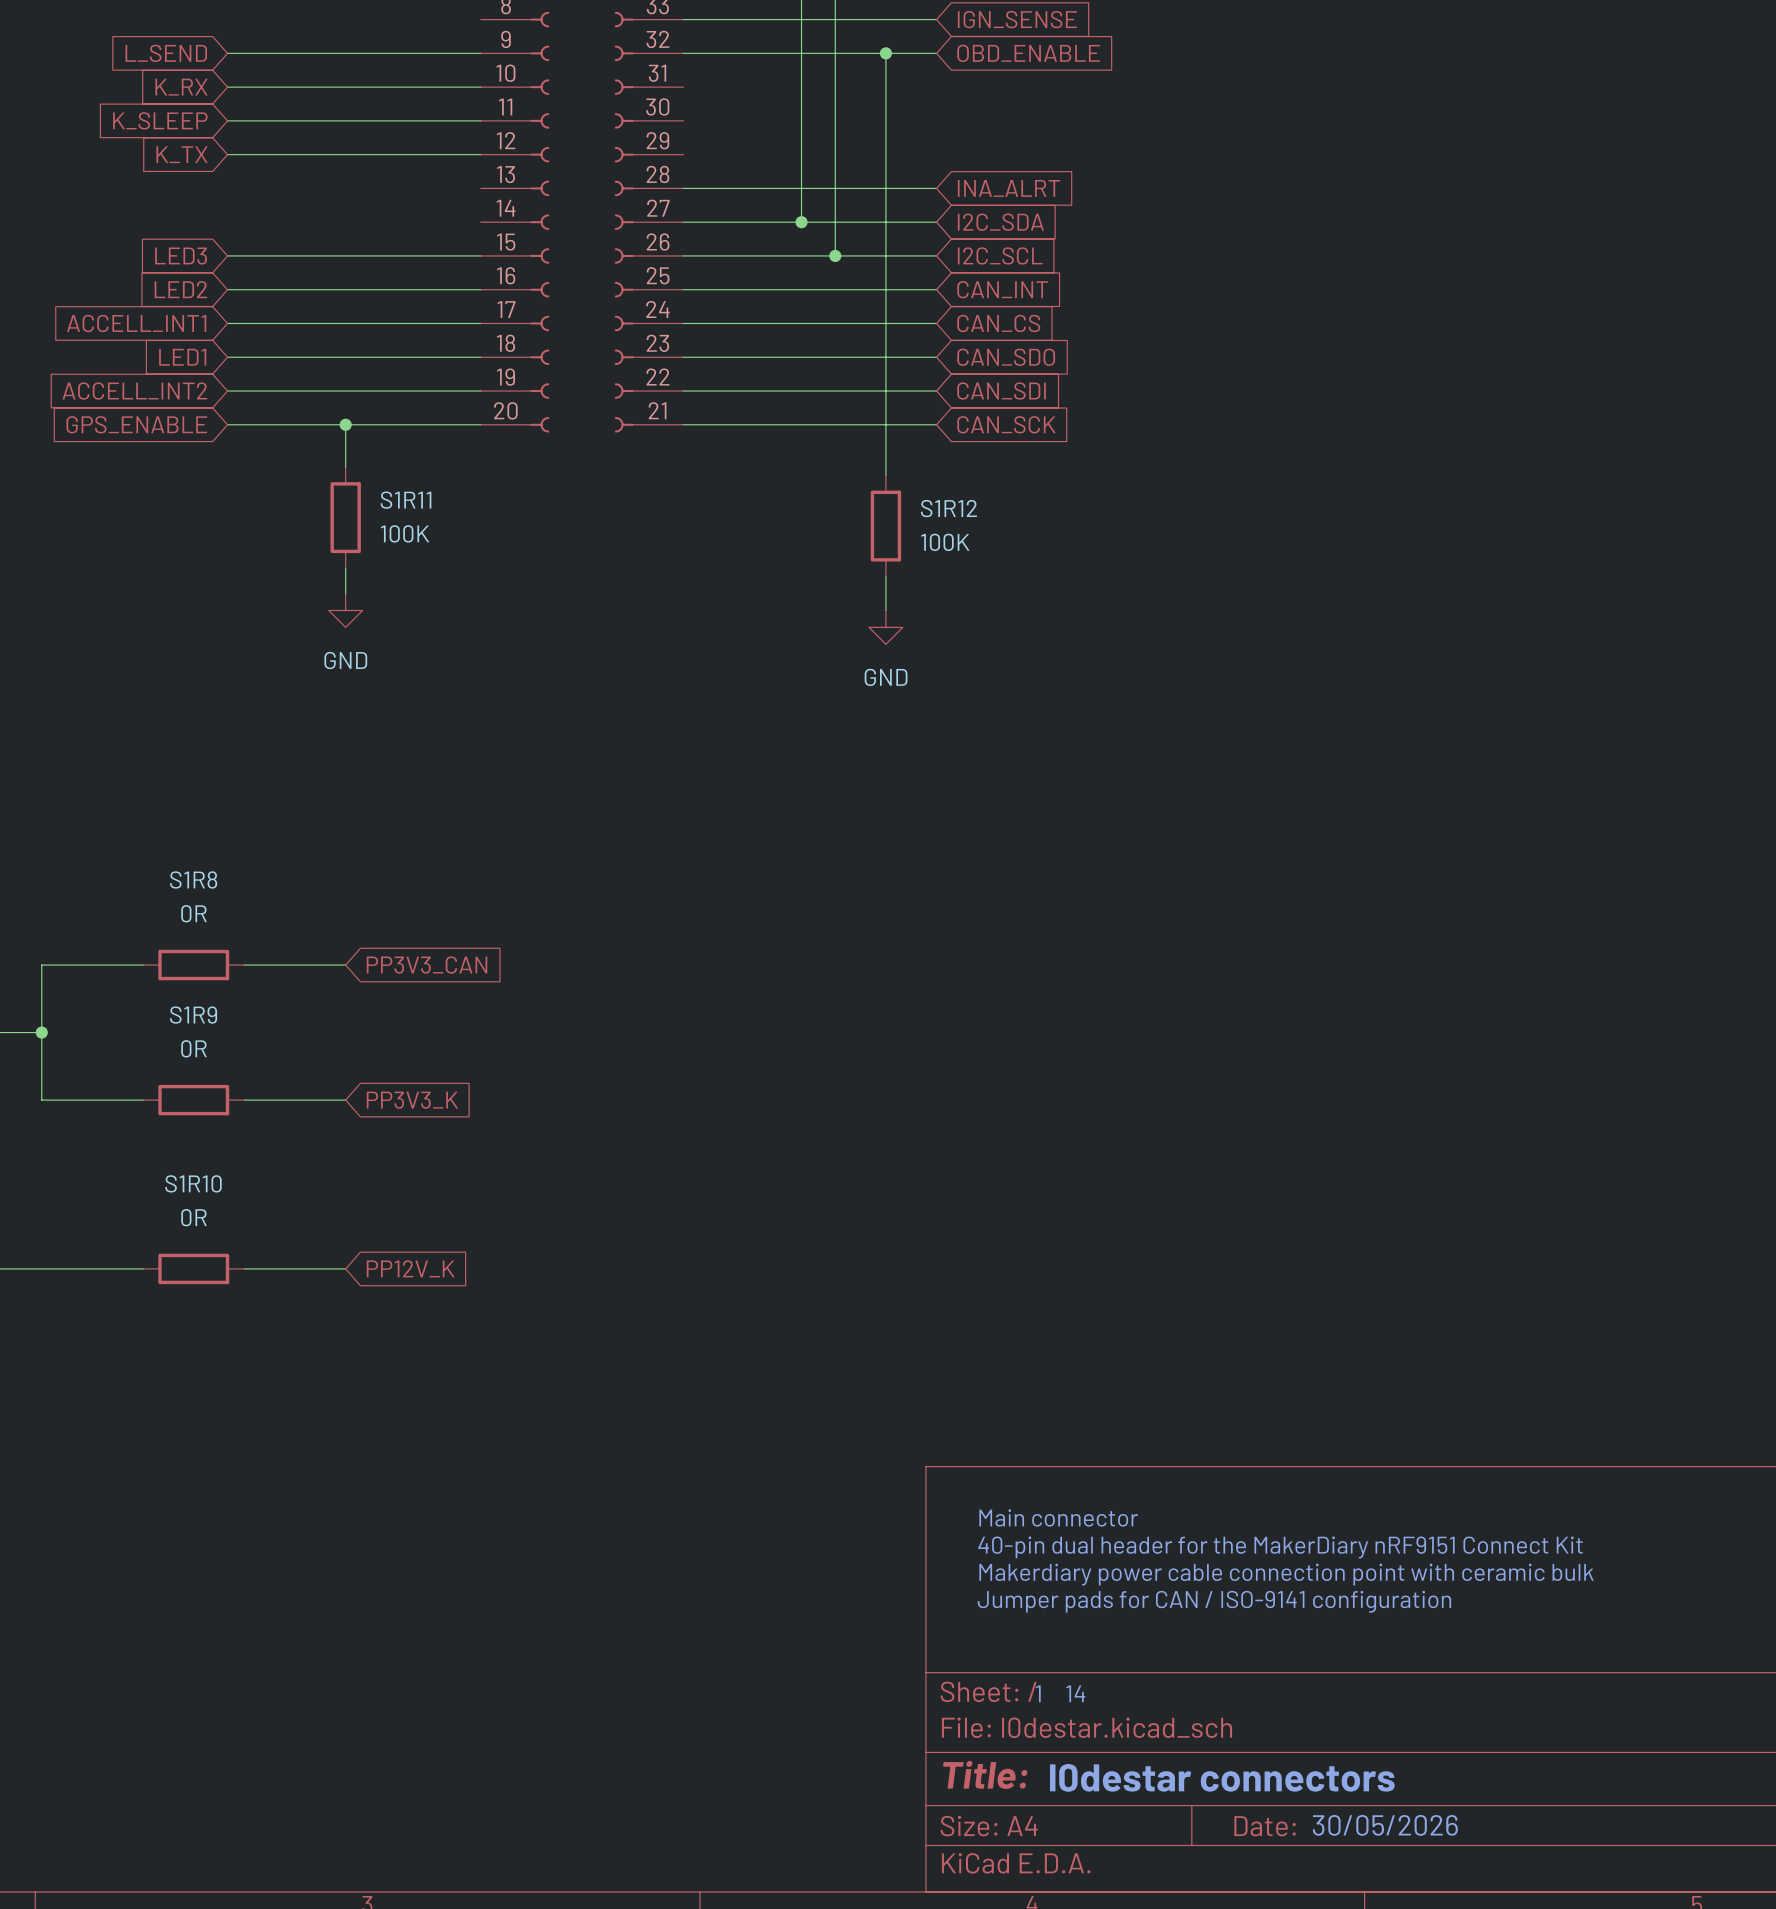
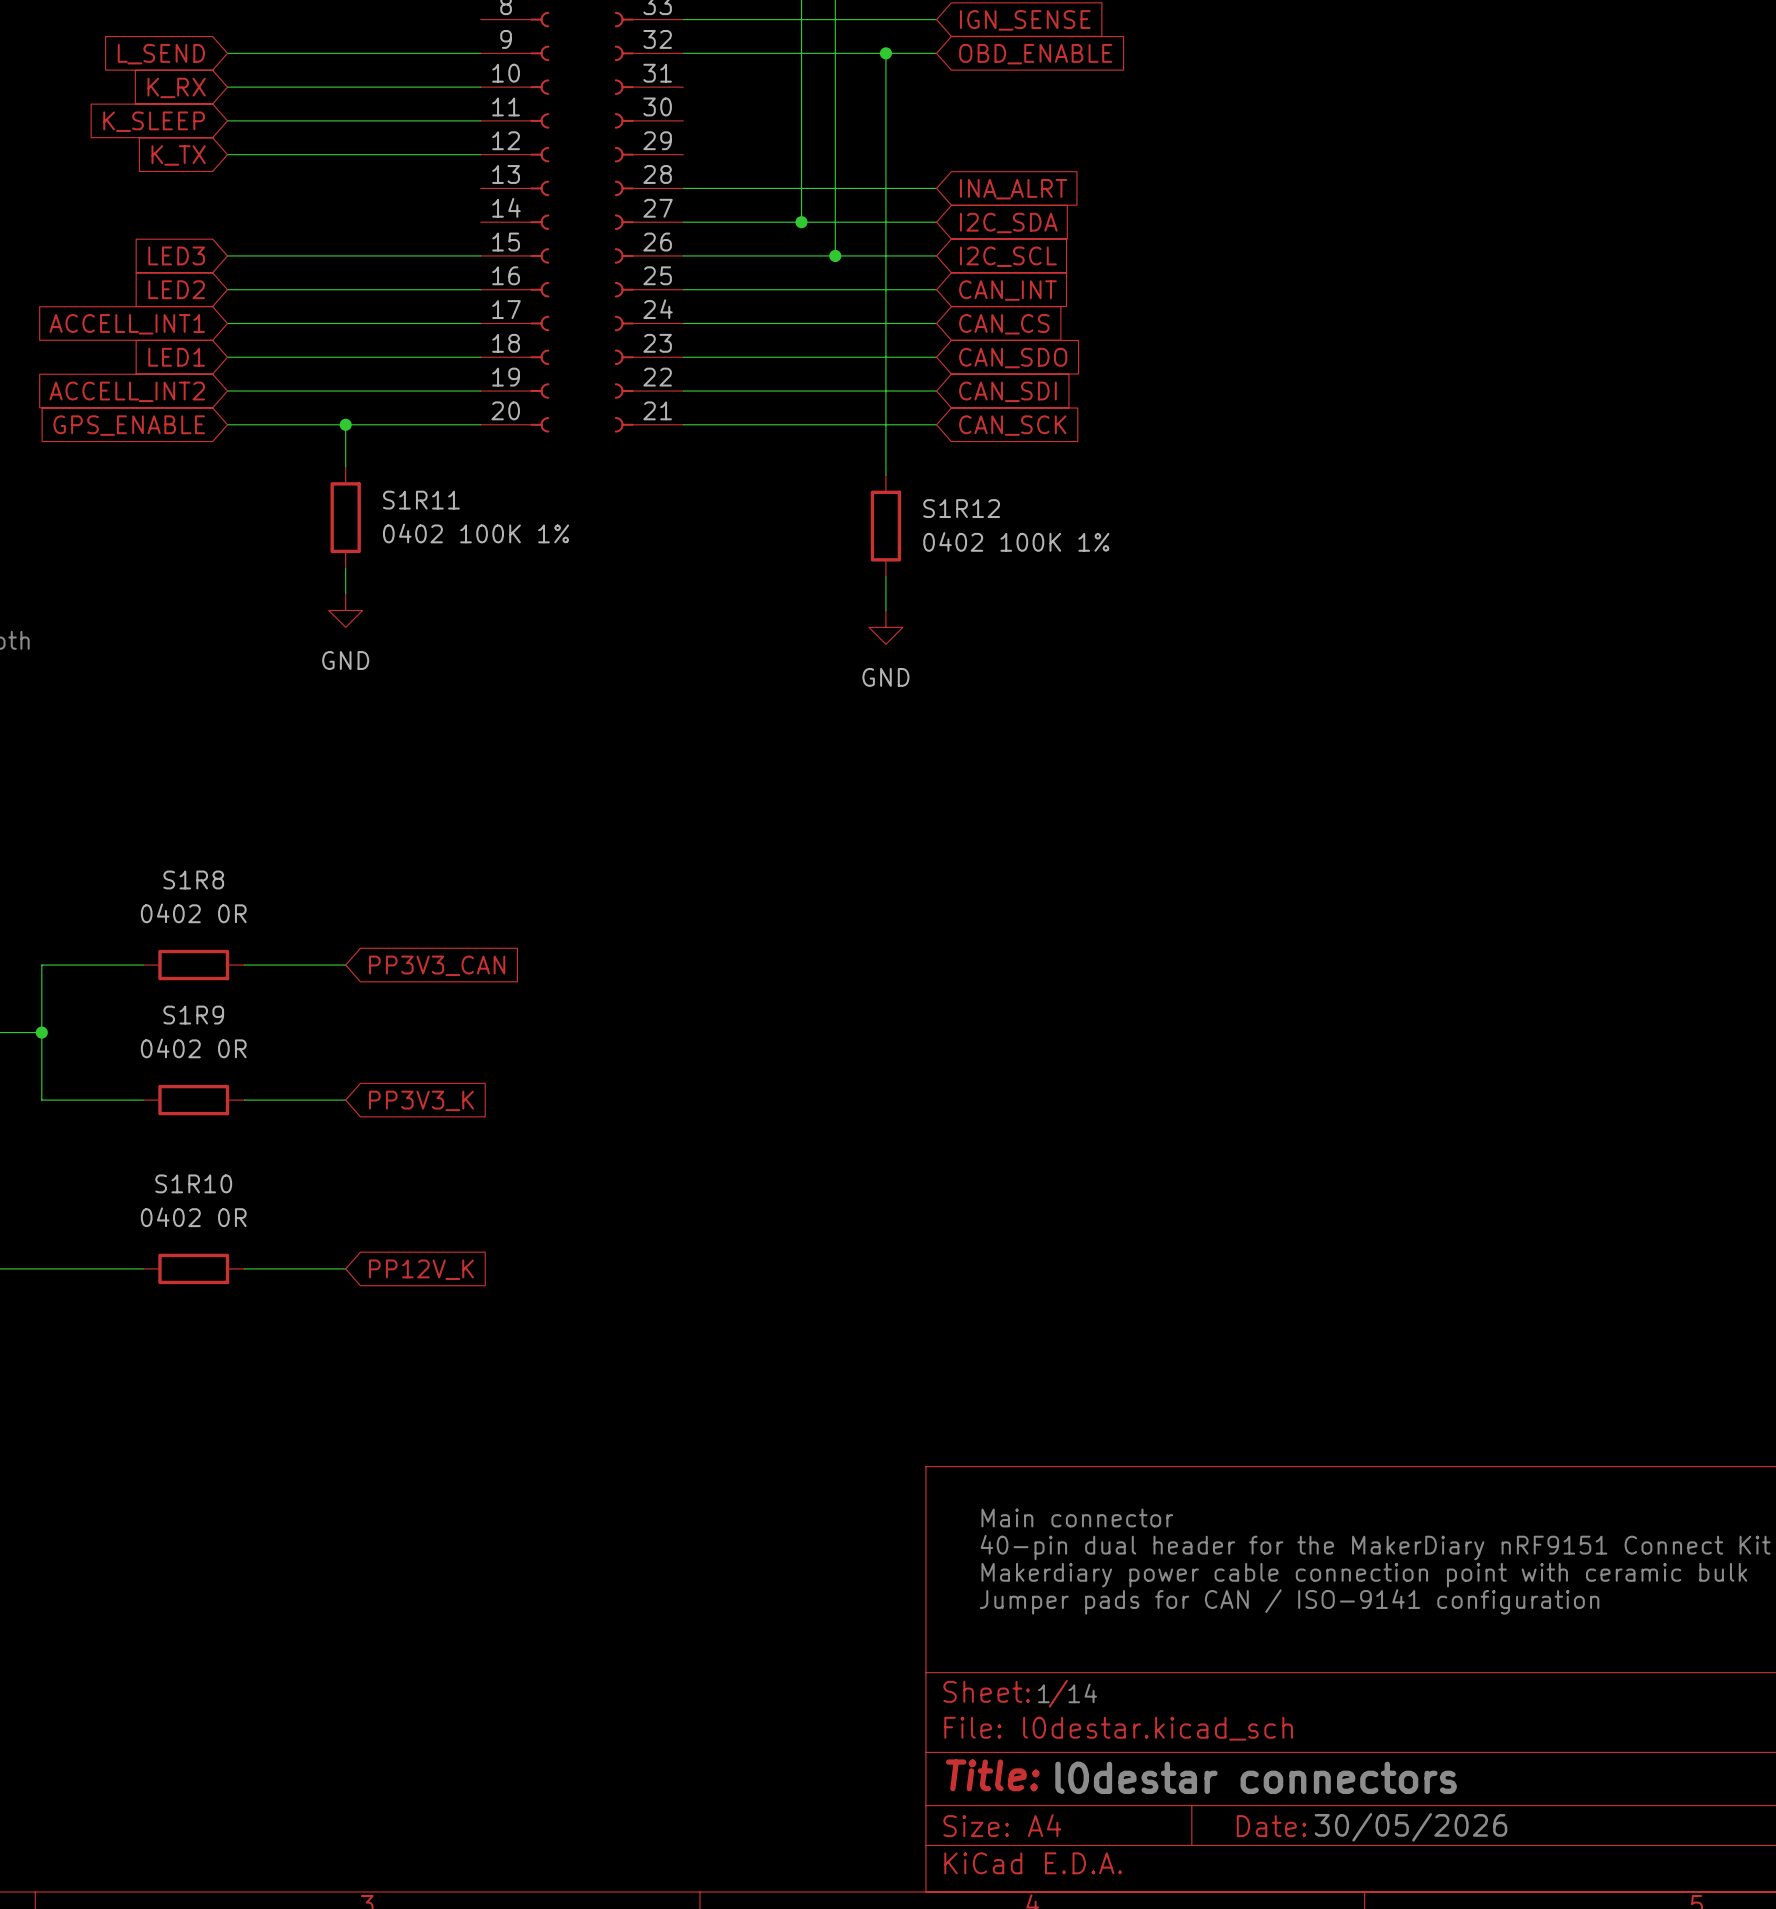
S1R11 value: 100K (405, 533) -> 0402 100K 1% (476, 533)
S1R12 value: 100K (945, 542) -> 0402 100K 1% (1016, 541)
S1R8 value: 0R (194, 913) -> 0402 0R (193, 913)
S1R9 value: 0R (194, 1048) -> 0402 0R (193, 1048)
S1R10 value: 0R (194, 1217) -> 0402 0R (193, 1217)

